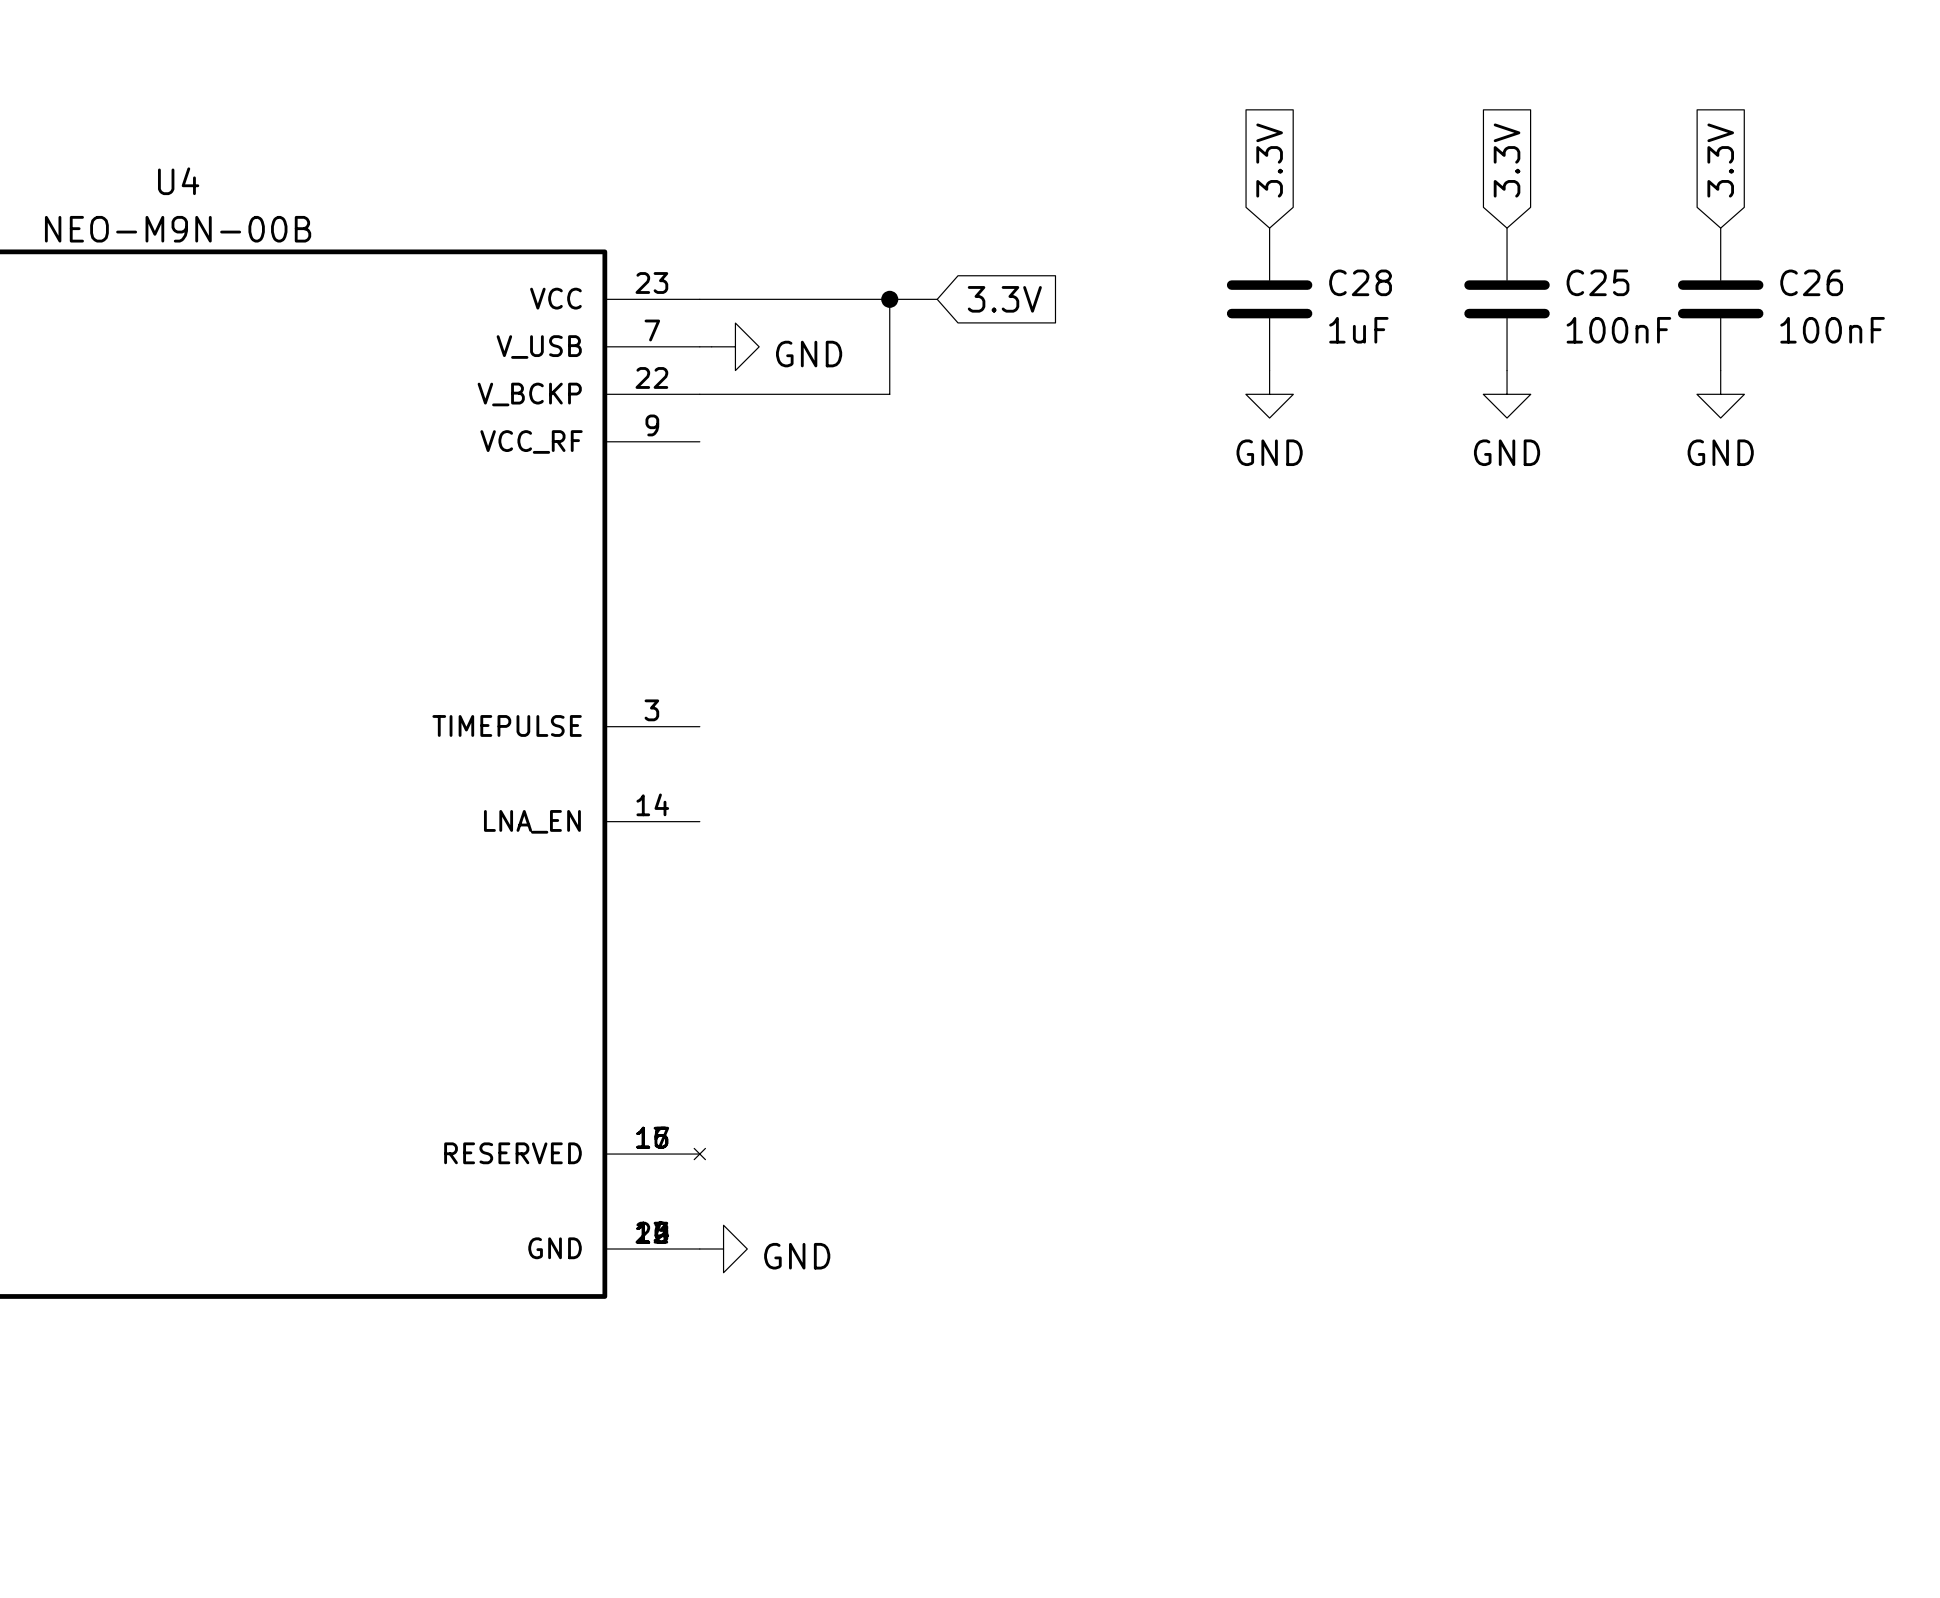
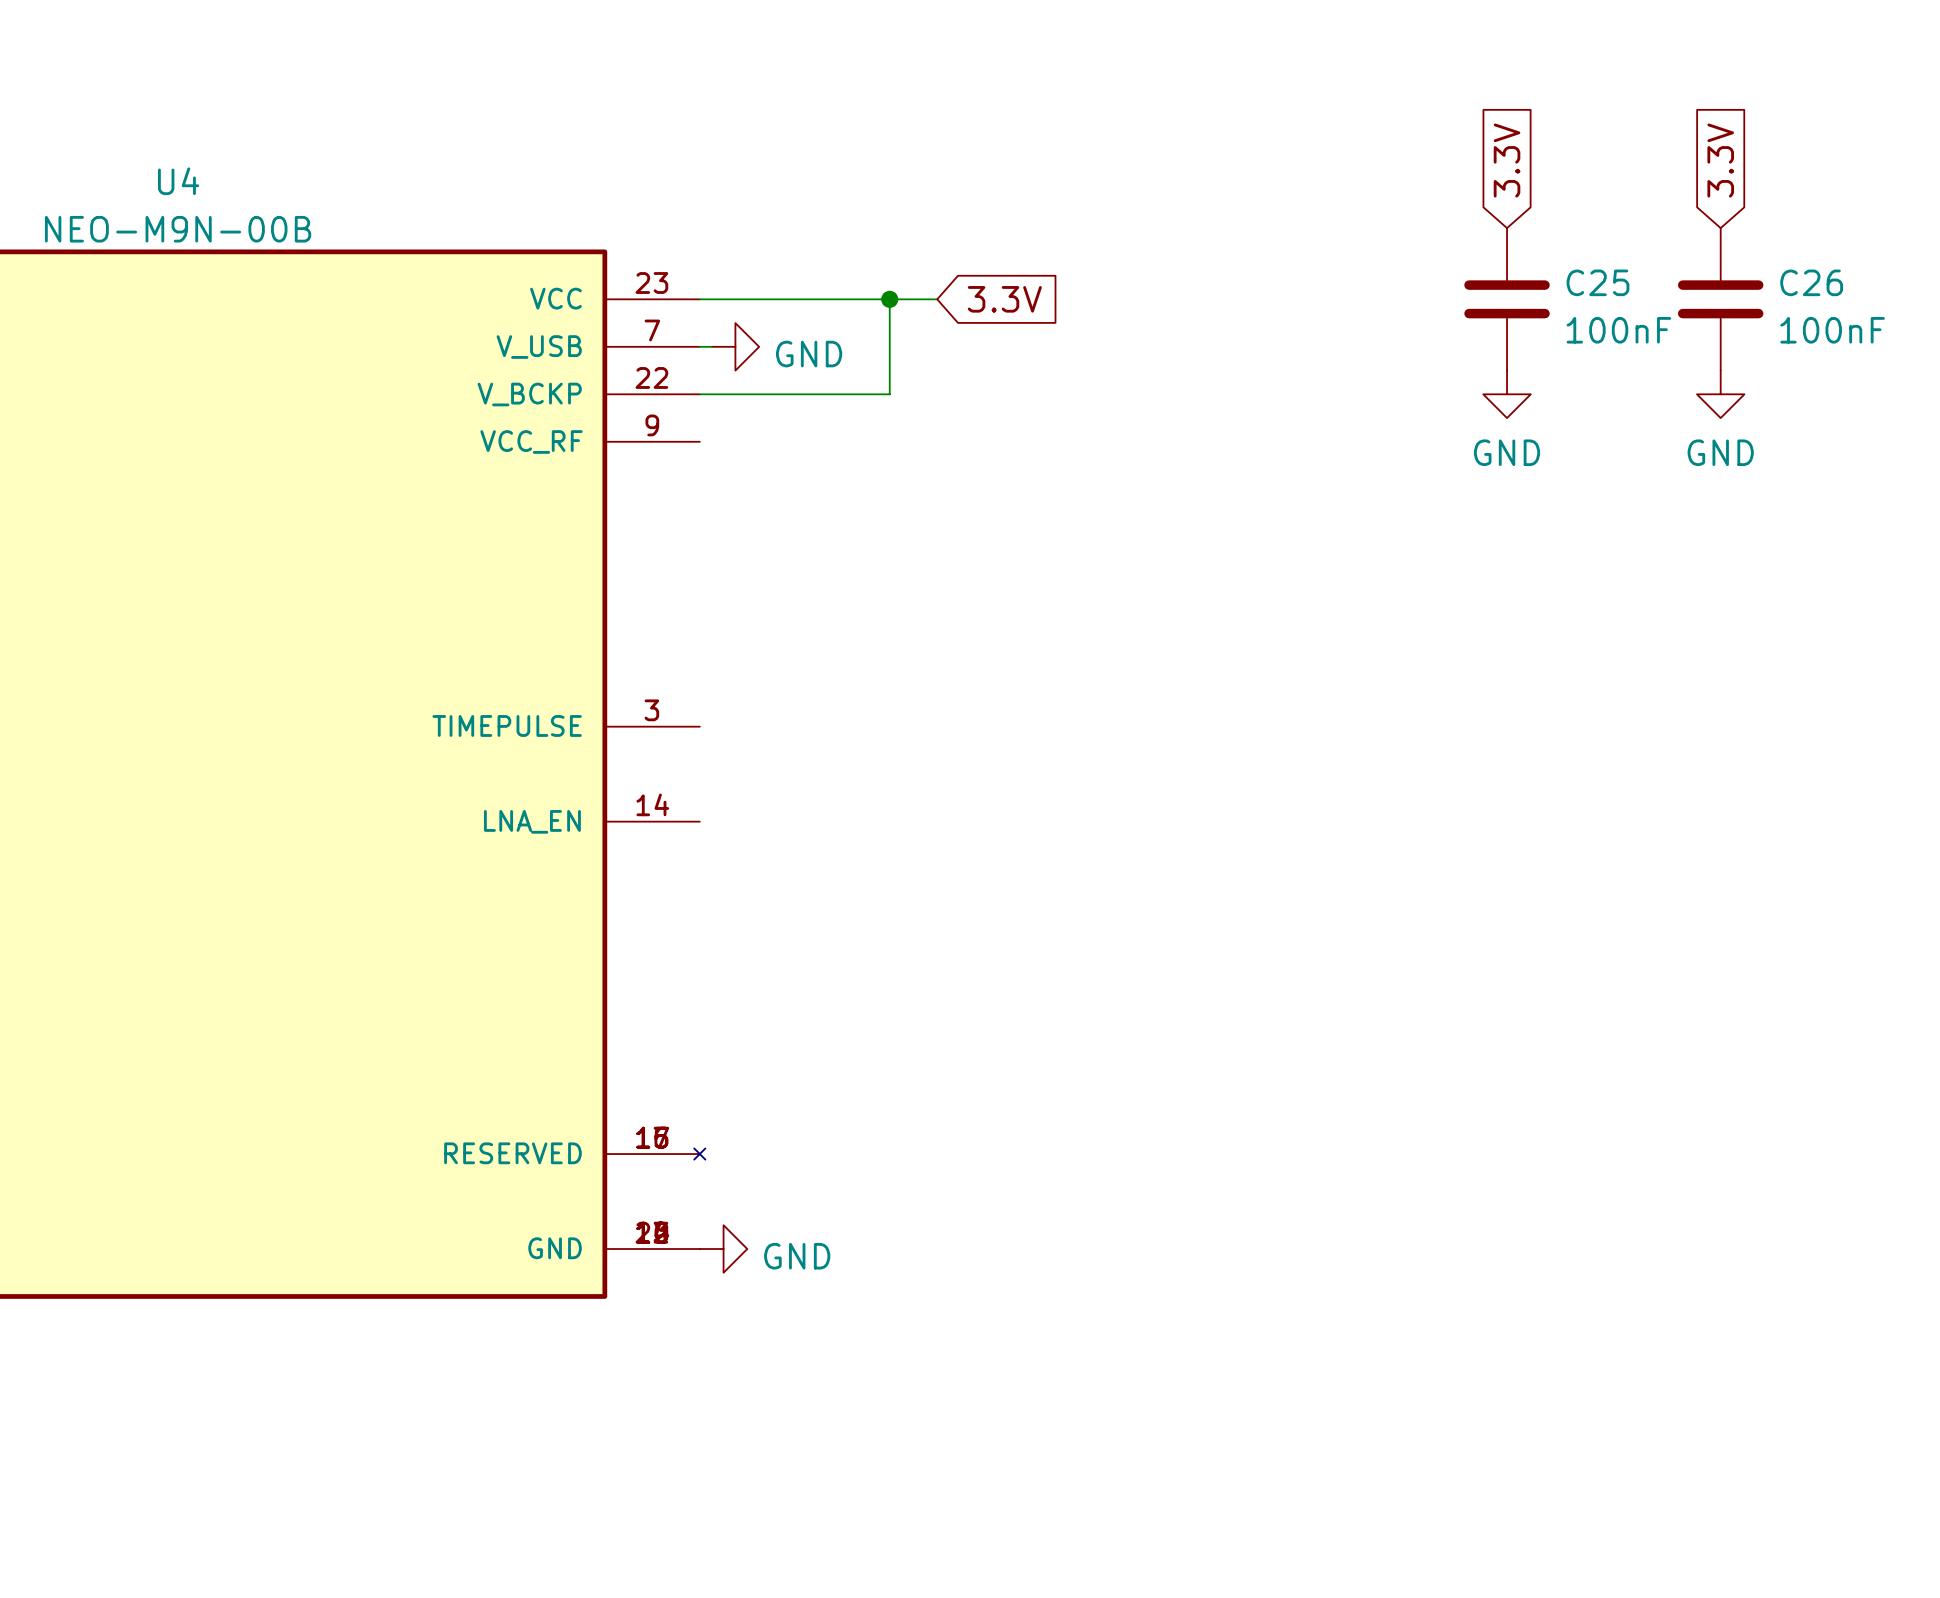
global label: 3.3V (1269, 160) -> none
C28: 1uF (1269, 299) -> none
power symbol: GND (1269, 394) -> none

